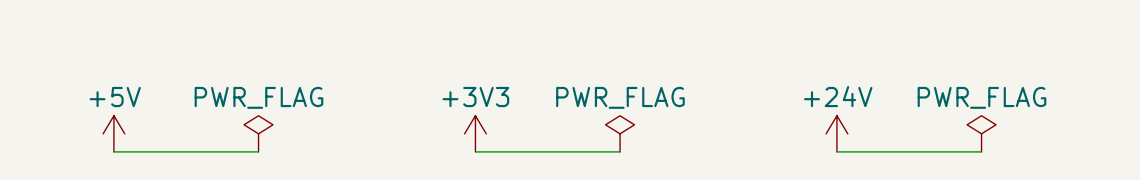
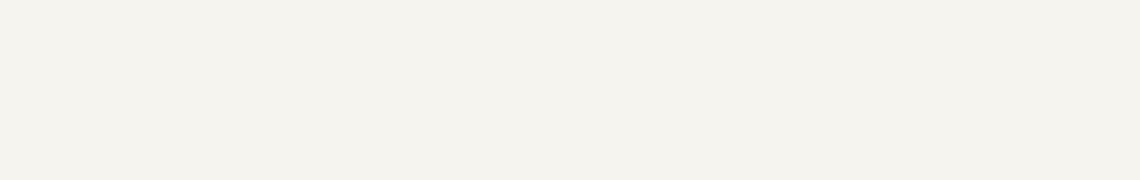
power symbol: +5V (113, 133) -> none
power symbol: PWR_FLAG (258, 133) -> none
power symbol: +3V3 (475, 133) -> none
power symbol: PWR_FLAG (620, 133) -> none
power symbol: +24V (836, 133) -> none
power symbol: PWR_FLAG (981, 133) -> none
wire: (113, 151) (258, 151) -> none
wire: (475, 151) (620, 151) -> none
wire: (836, 151) (981, 151) -> none

